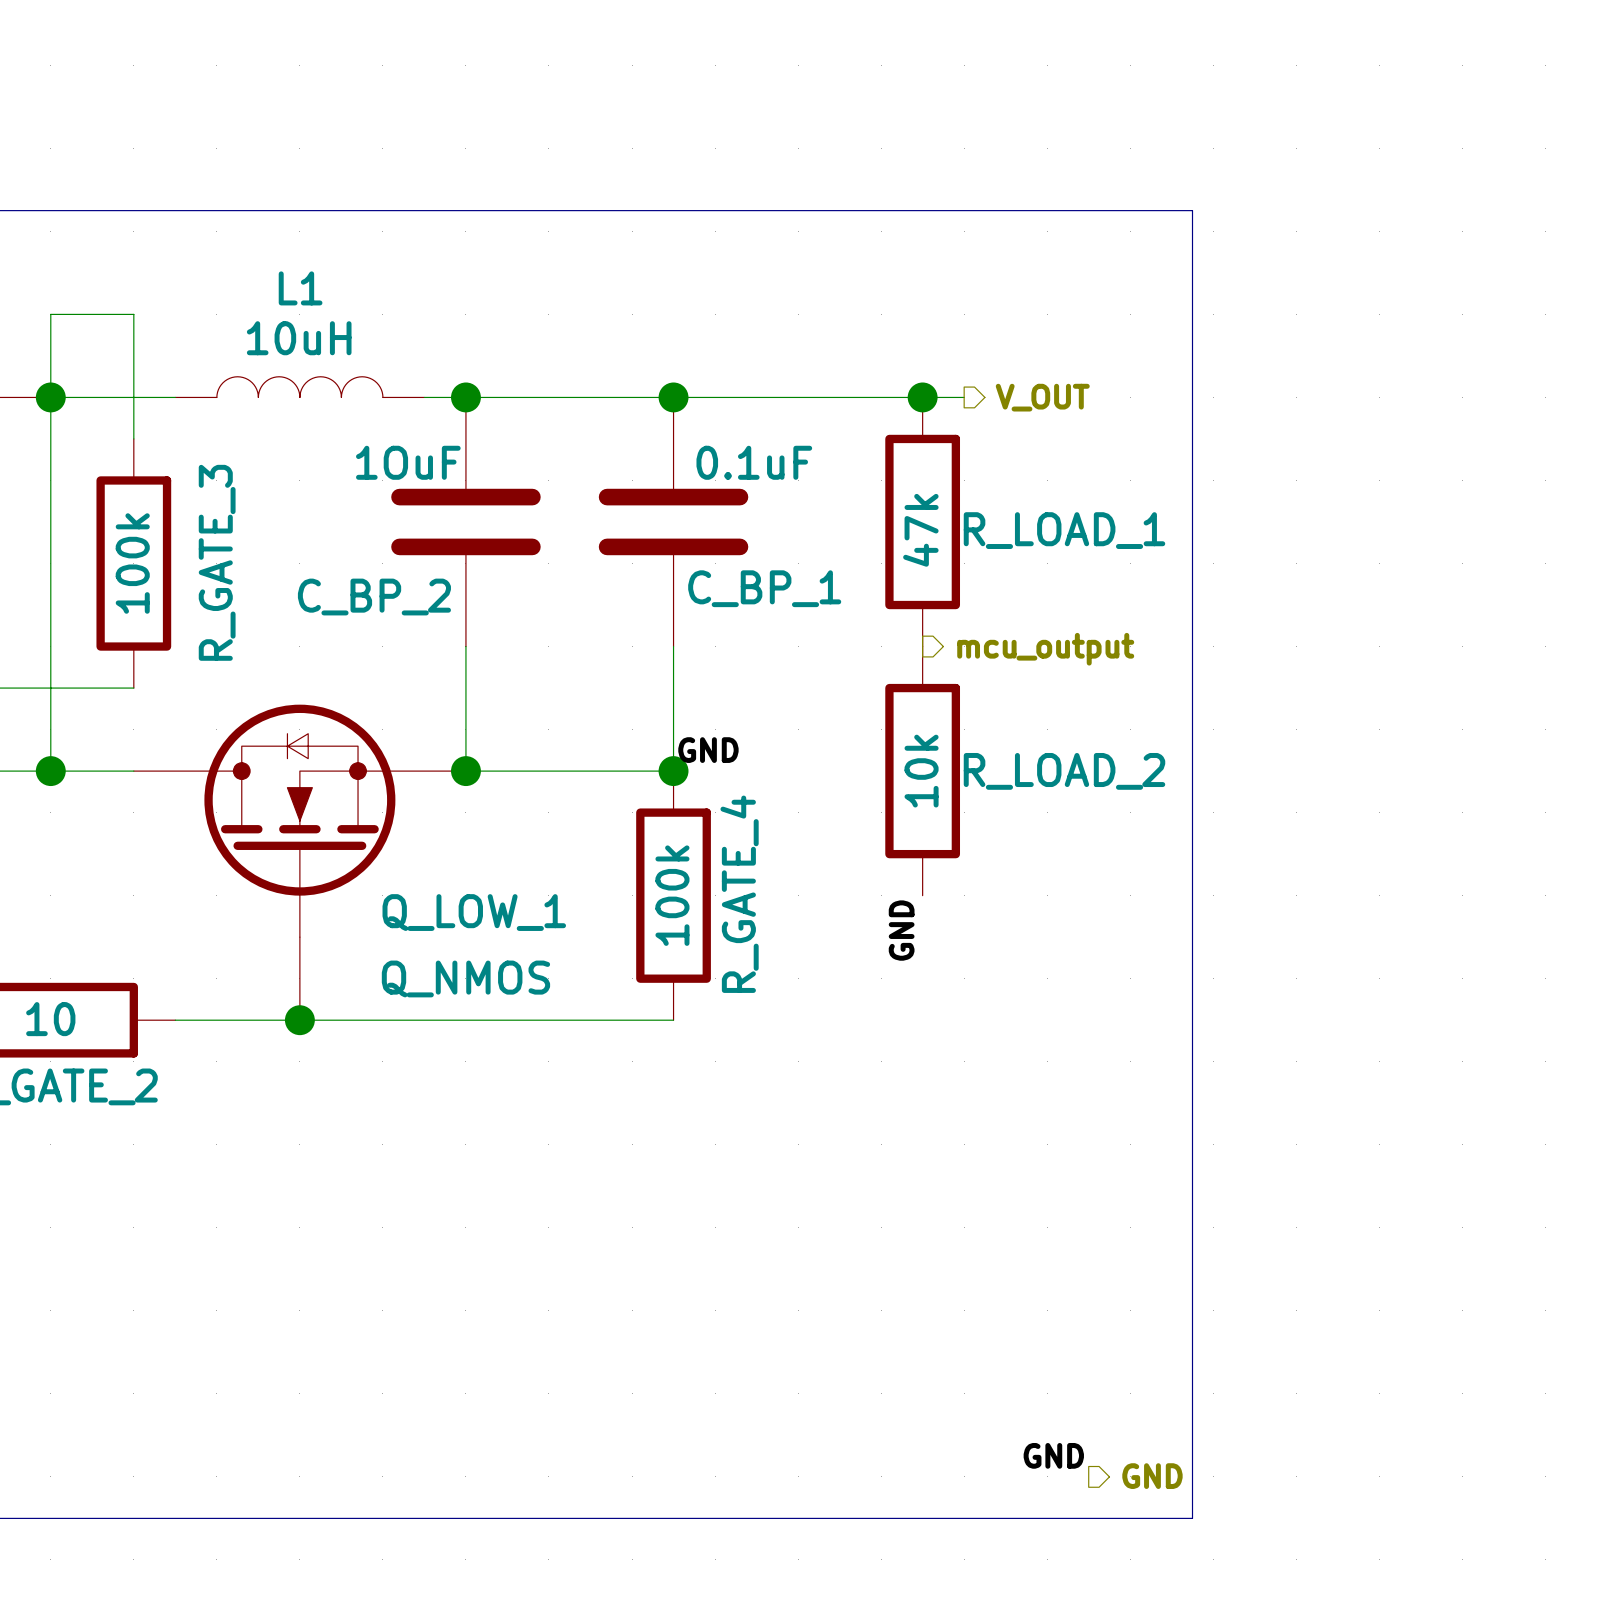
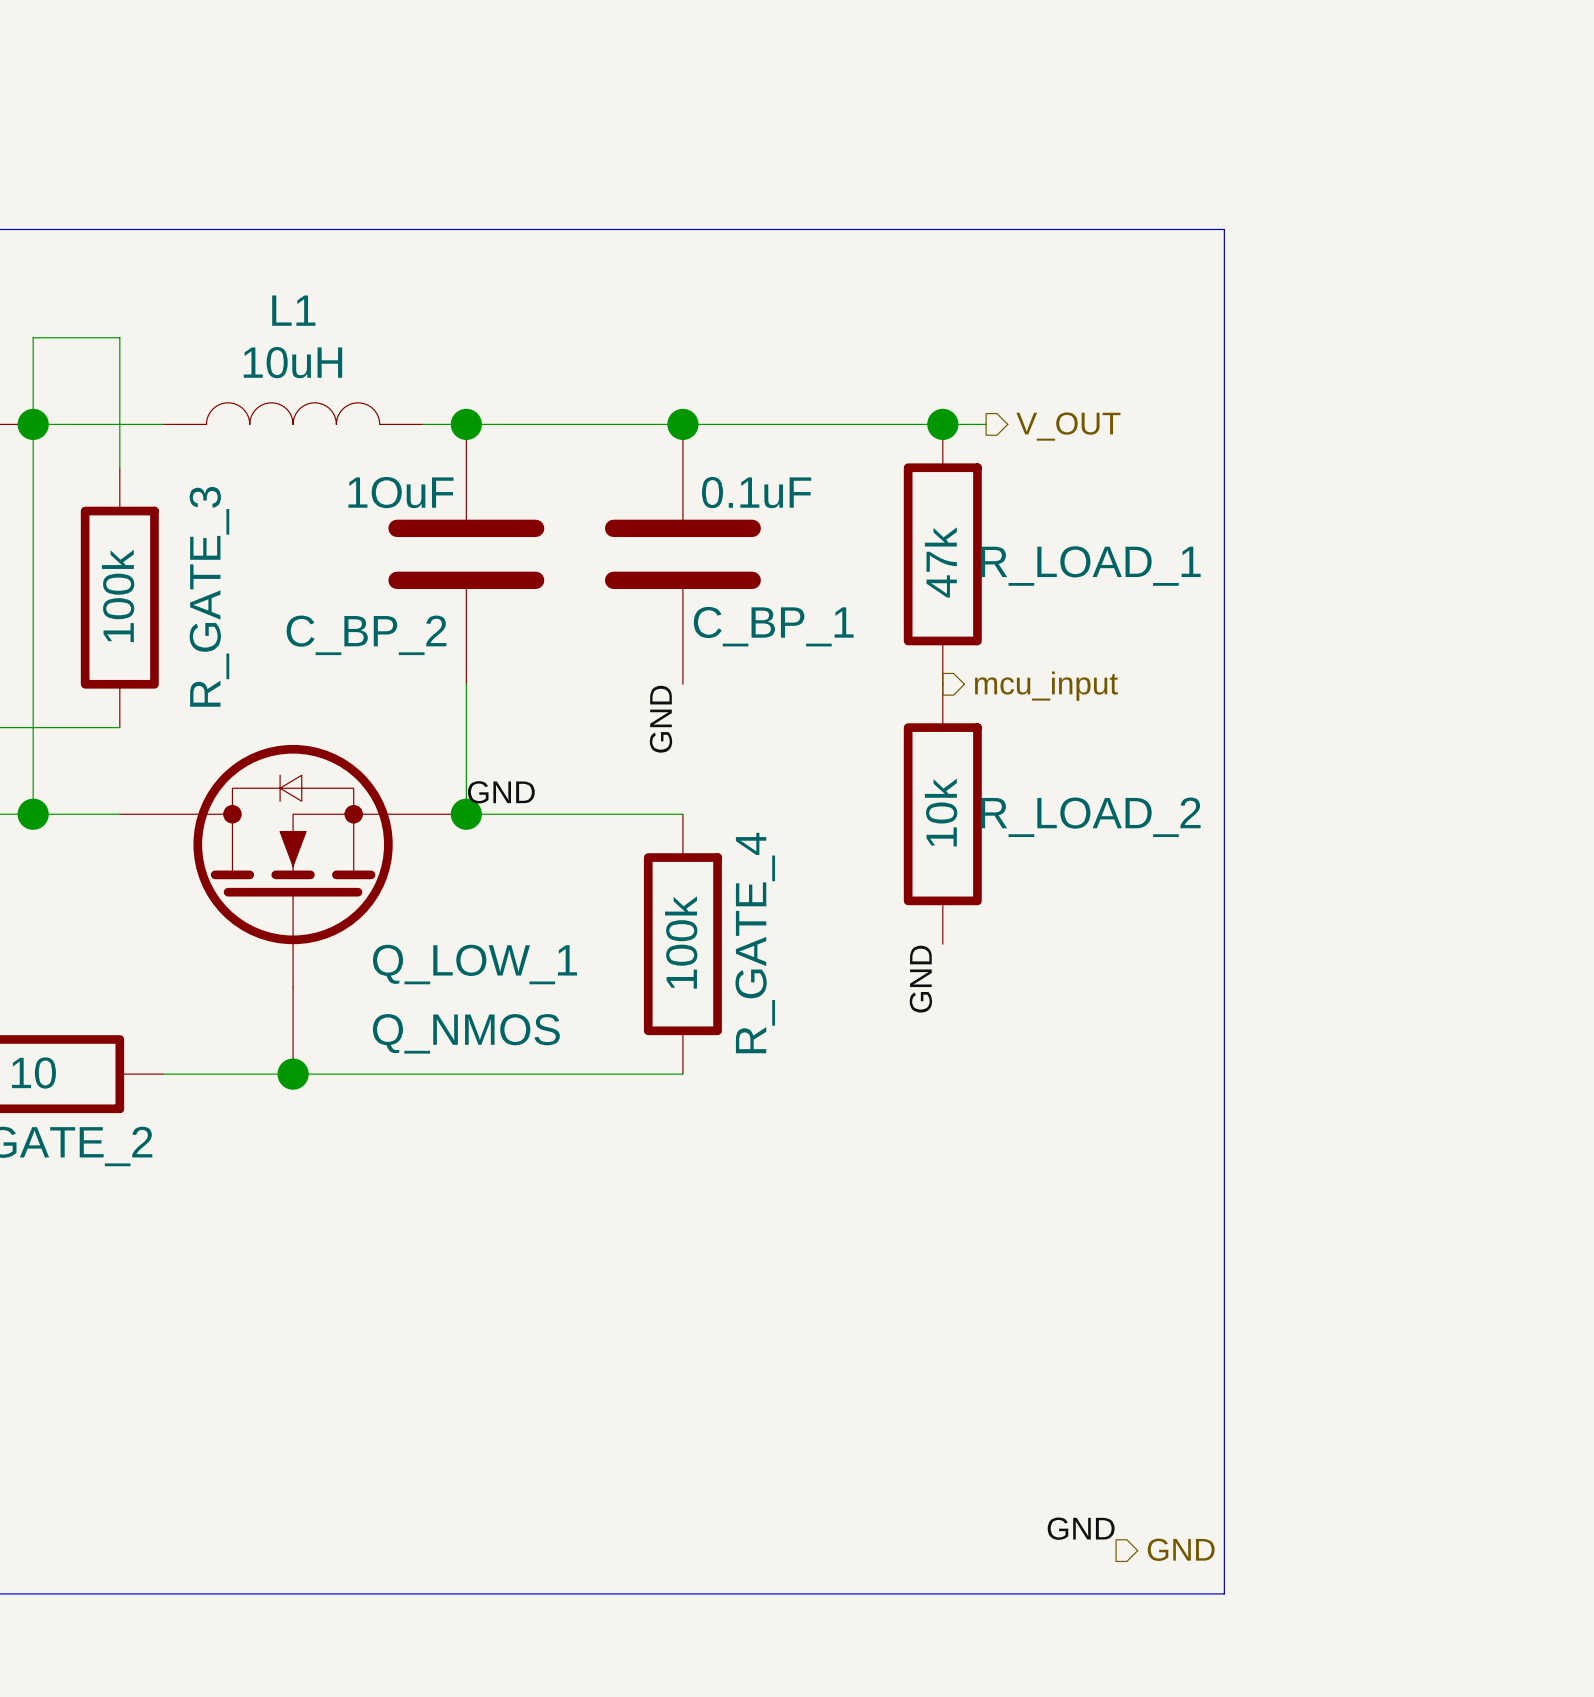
wire: (673, 646) (673, 771) -> none
hierarchical label: mcu_output (1045, 649) -> mcu_input (1046, 686)
label: none -> GND (660, 719)
label: none -> GND (501, 792)
label: GND (708, 750) -> none
junction: (673, 771) -> none

